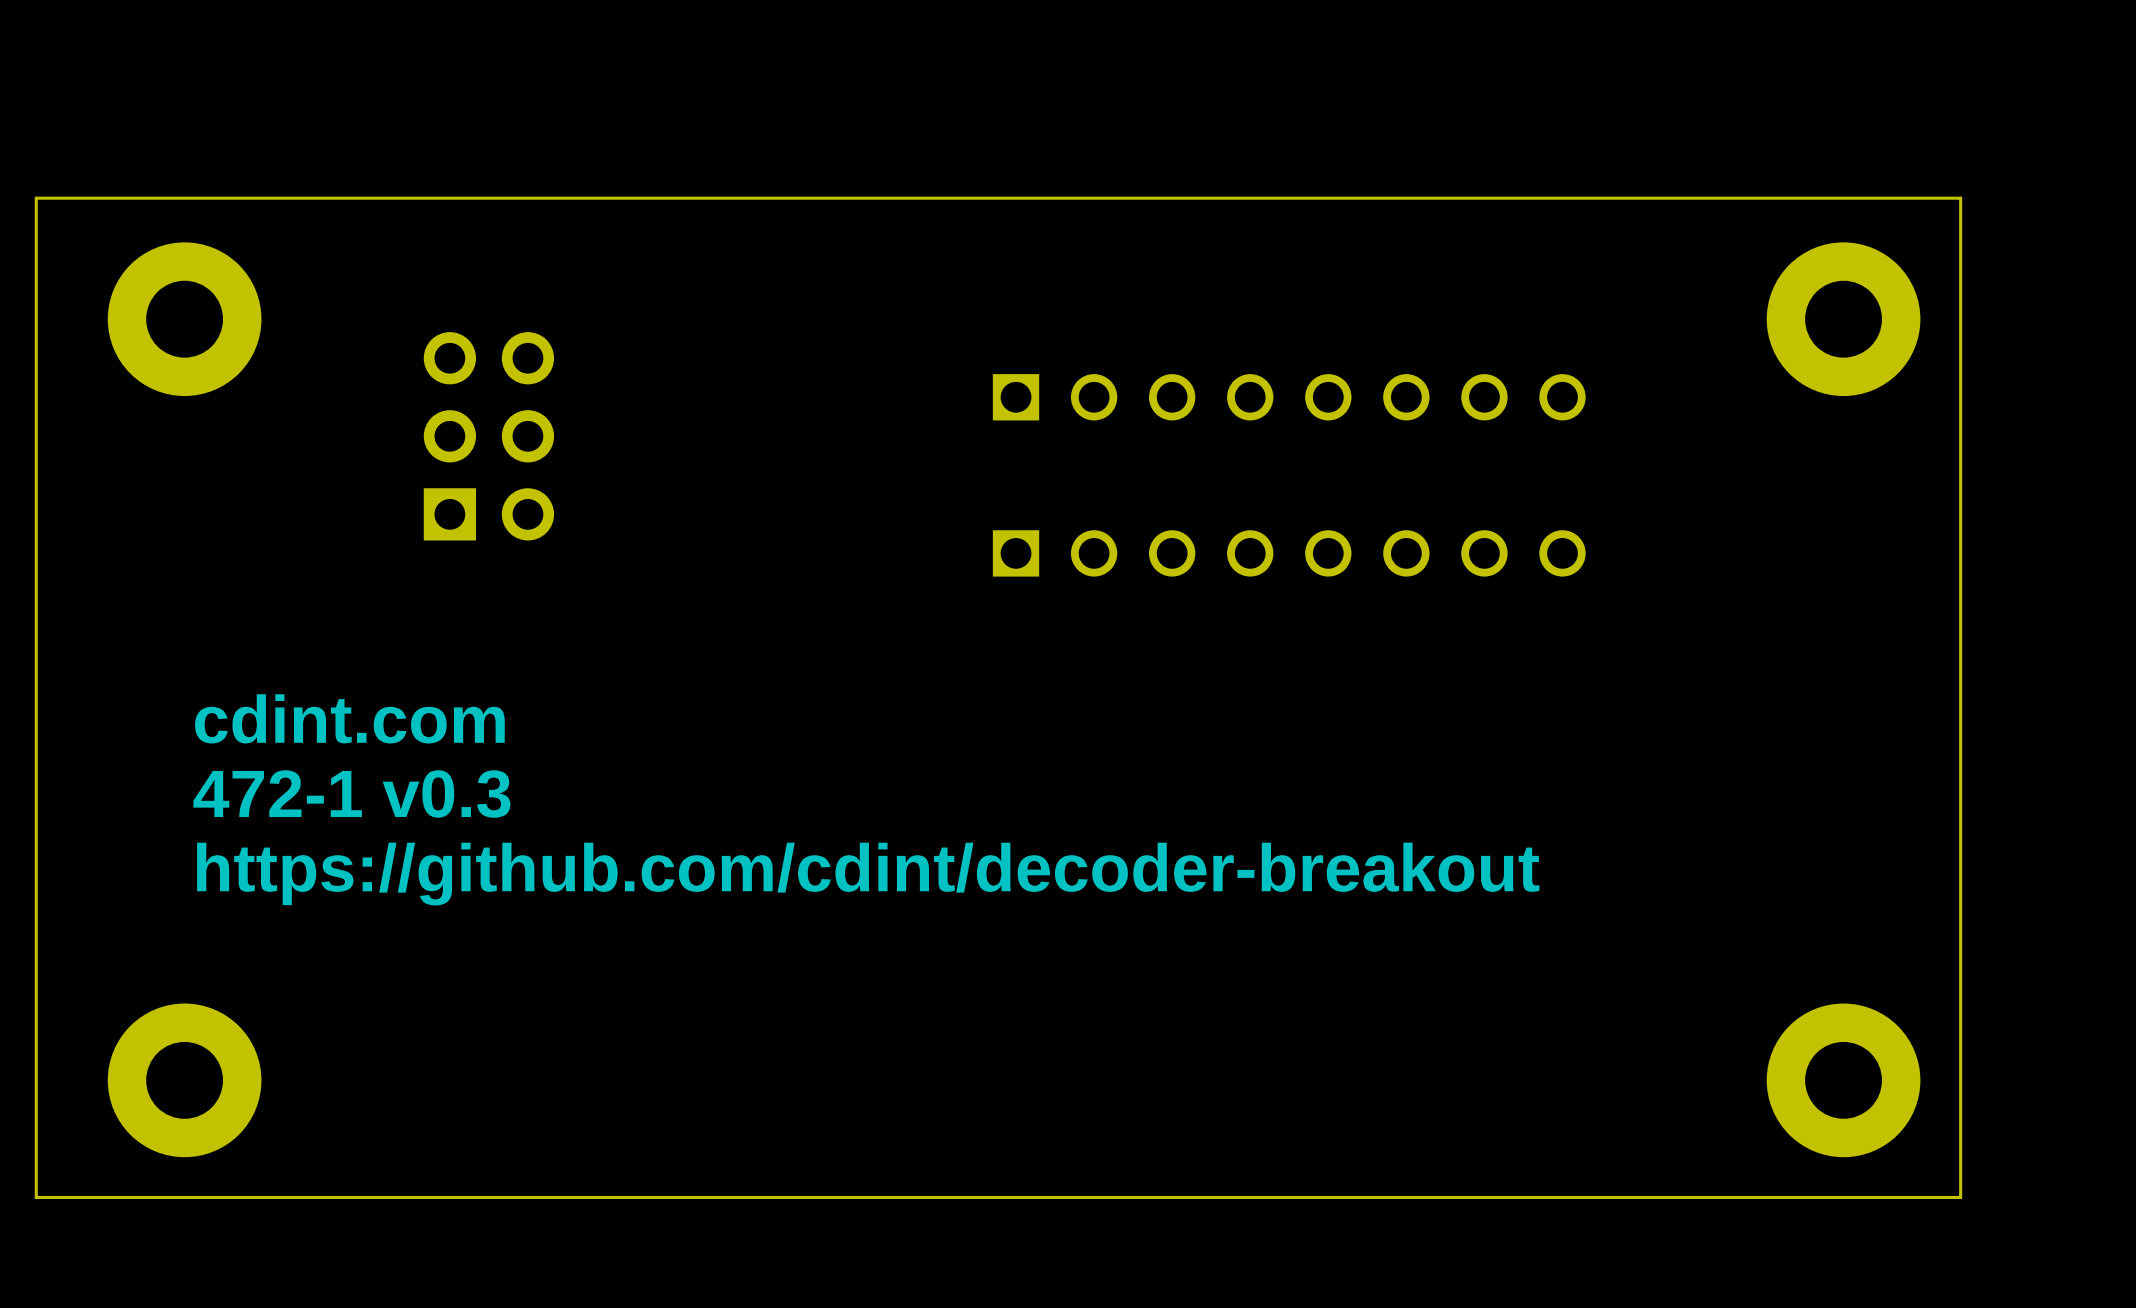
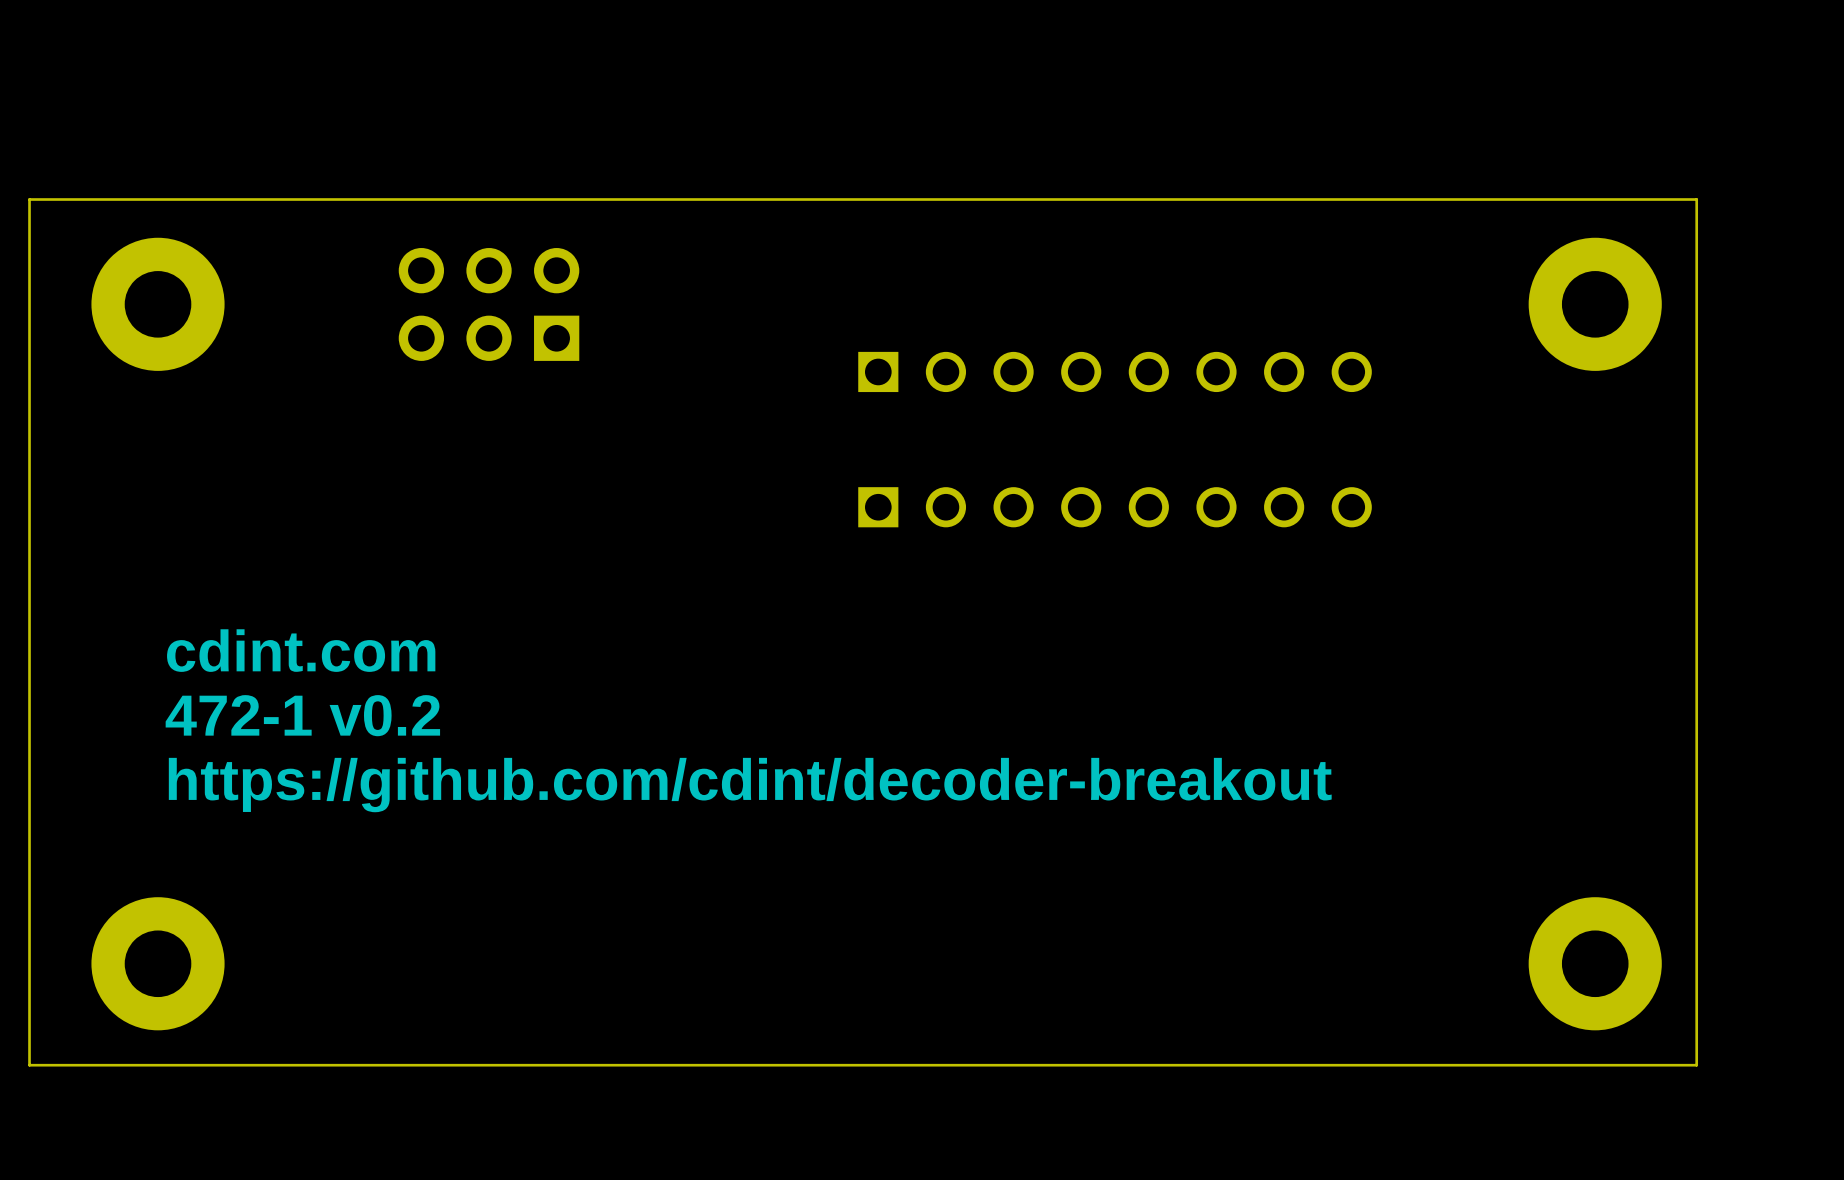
part rotation: 0° (488, 436) -> 90° counterclockwise (489, 304)
part position: (488, 436) -> (489, 304)
text: 472-1 v0.3 (351, 794) -> 472-1 v0.2 (302, 715)

